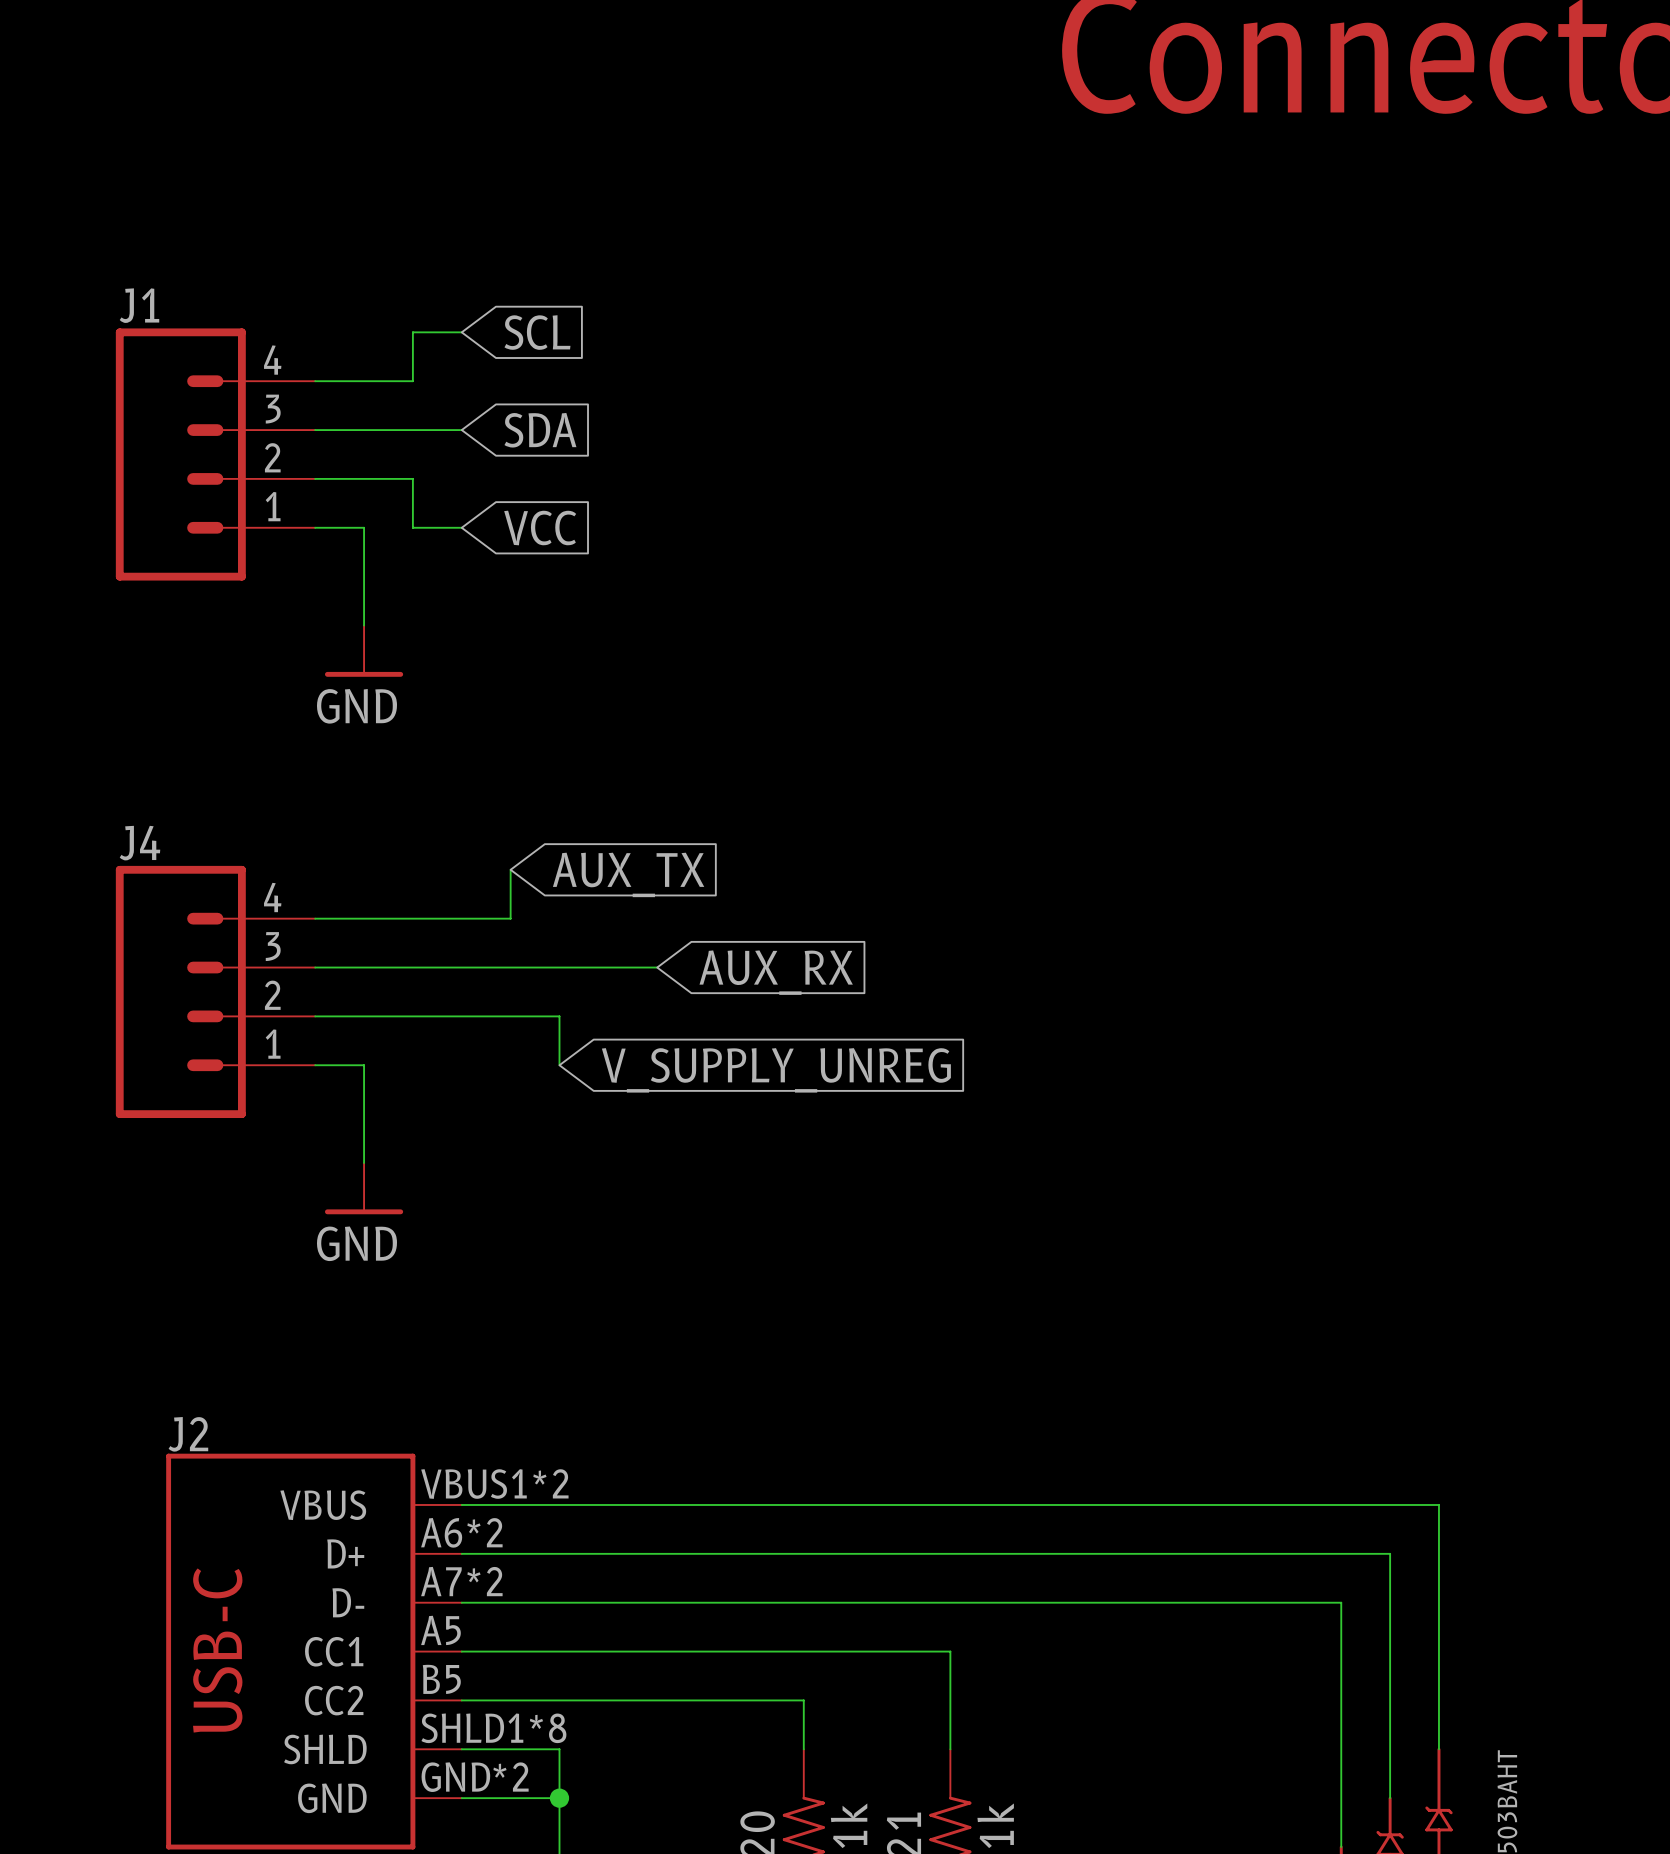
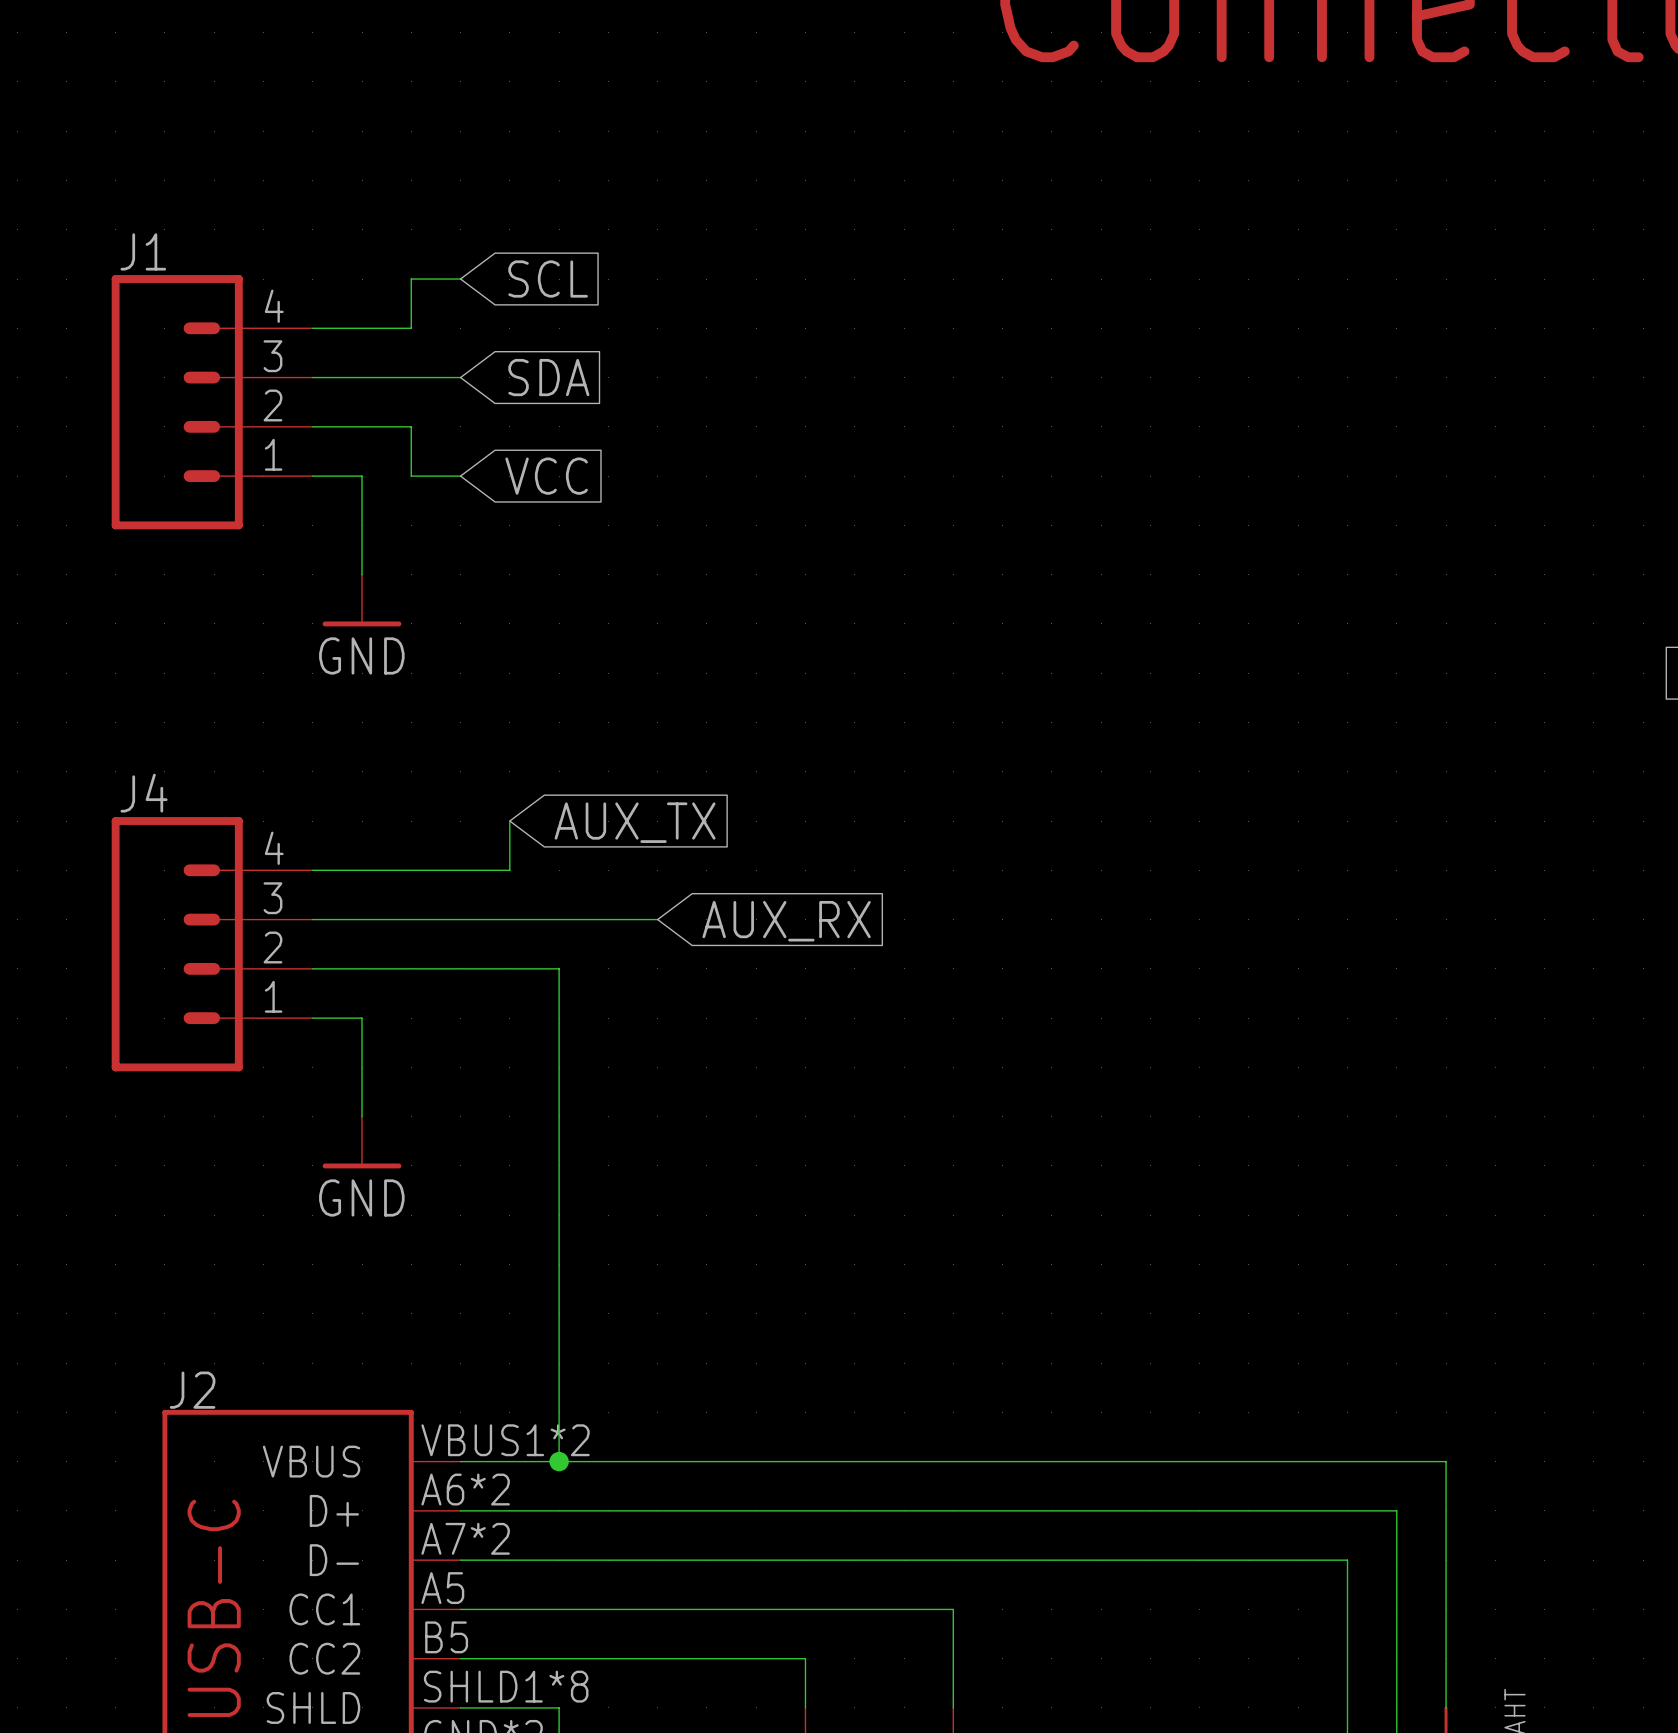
wire: none -> (559, 1018) (559, 1461)
global label: V_SUPPLY_UNREG (776, 1070) -> none
junction: none -> (559, 1461)

